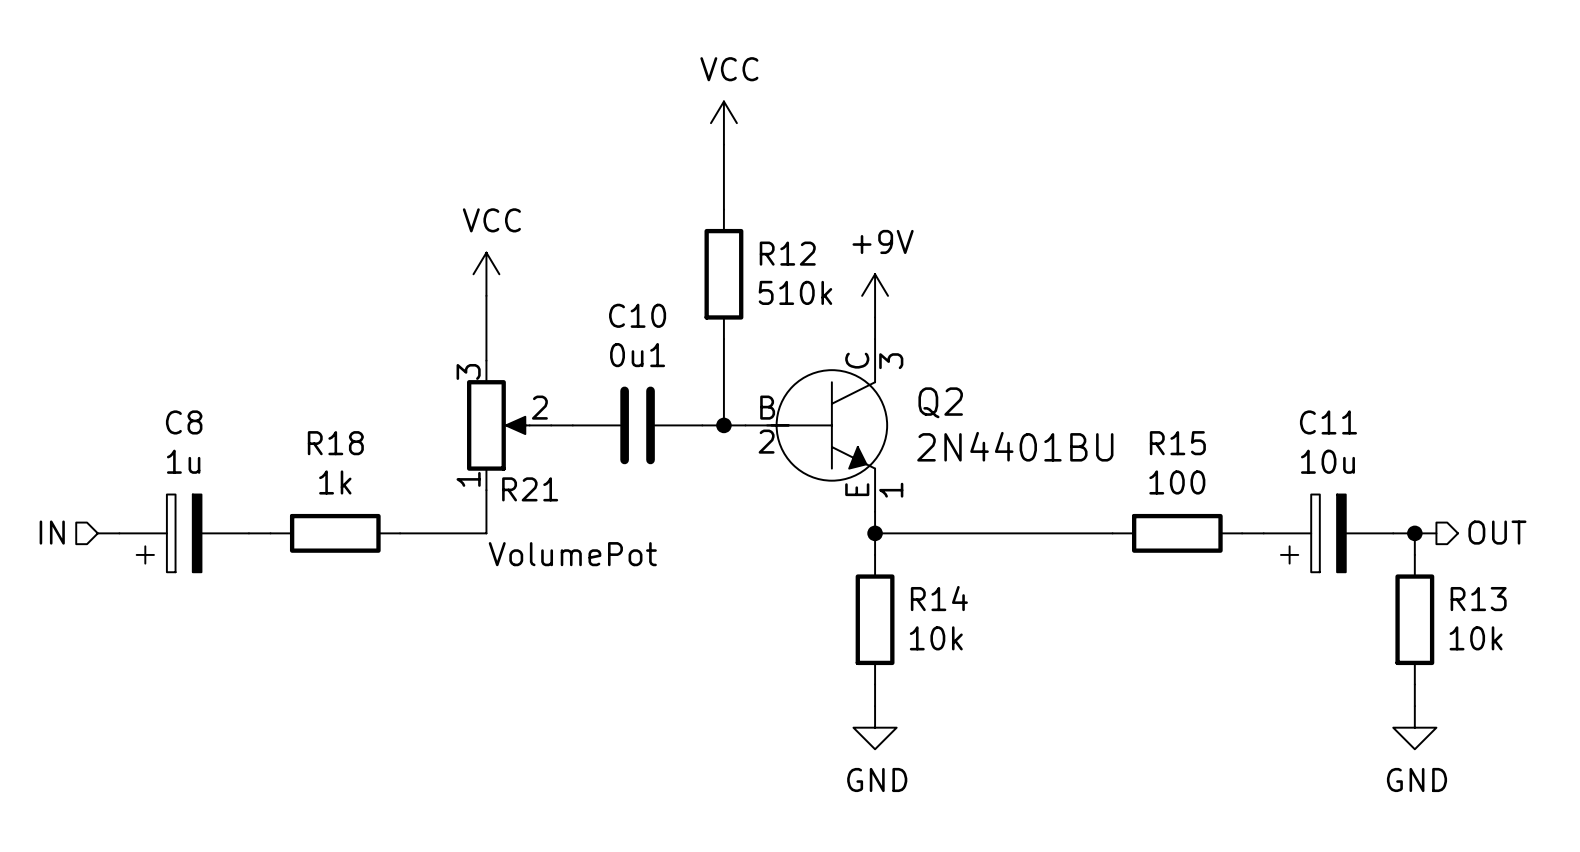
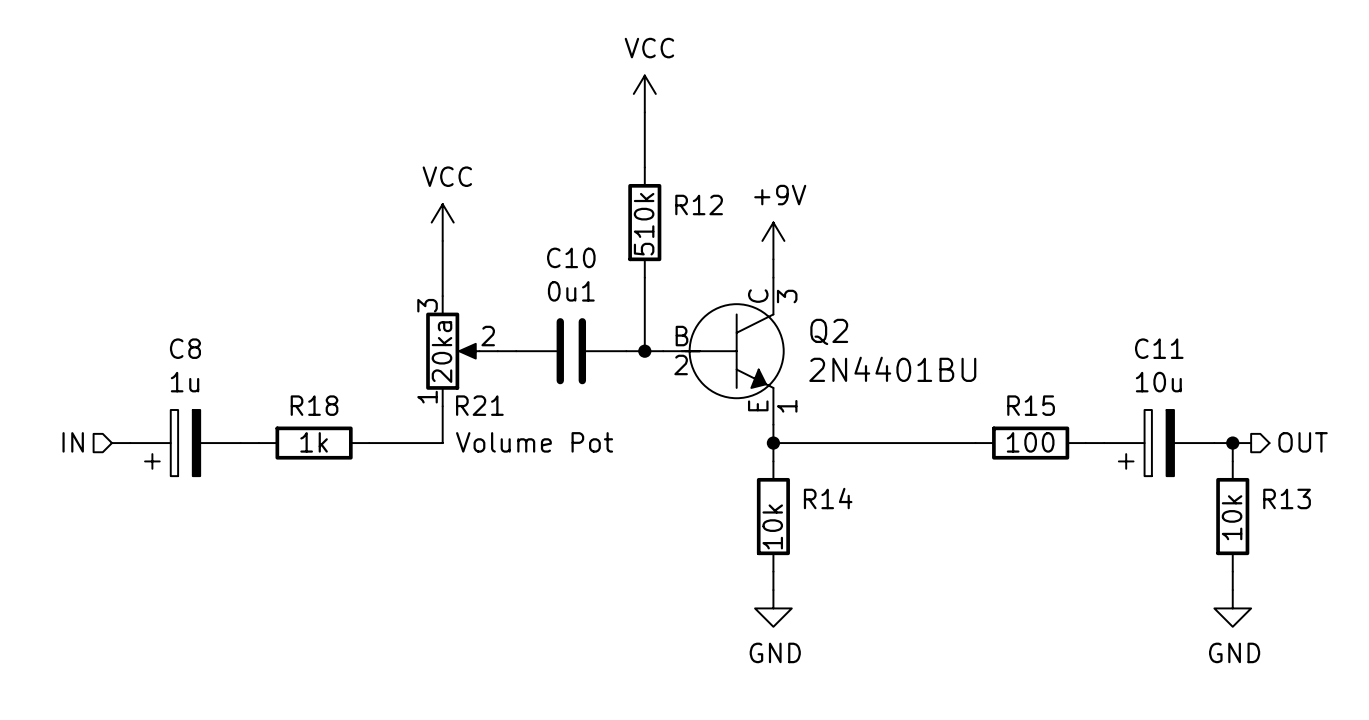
R12 value rotation: 0° (795, 292) -> 90° counterclockwise (644, 224)
R18 name position: R18 (335, 443) -> R18 (314, 405)
R15 name position: R15 (1177, 443) -> R15 (1031, 405)
R18 value position: 1k (335, 482) -> 1k (314, 442)
R15 value position: 100 (1177, 482) -> 100 (1030, 442)
R21 text: none -> Volume Pot (534, 442)
R21 value: VolumePot (572, 554) -> 20ka (442, 352)
R14 value rotation: 0° (936, 638) -> 90° counterclockwise (772, 526)
R13 value rotation: 0° (1476, 638) -> 90° counterclockwise (1232, 517)

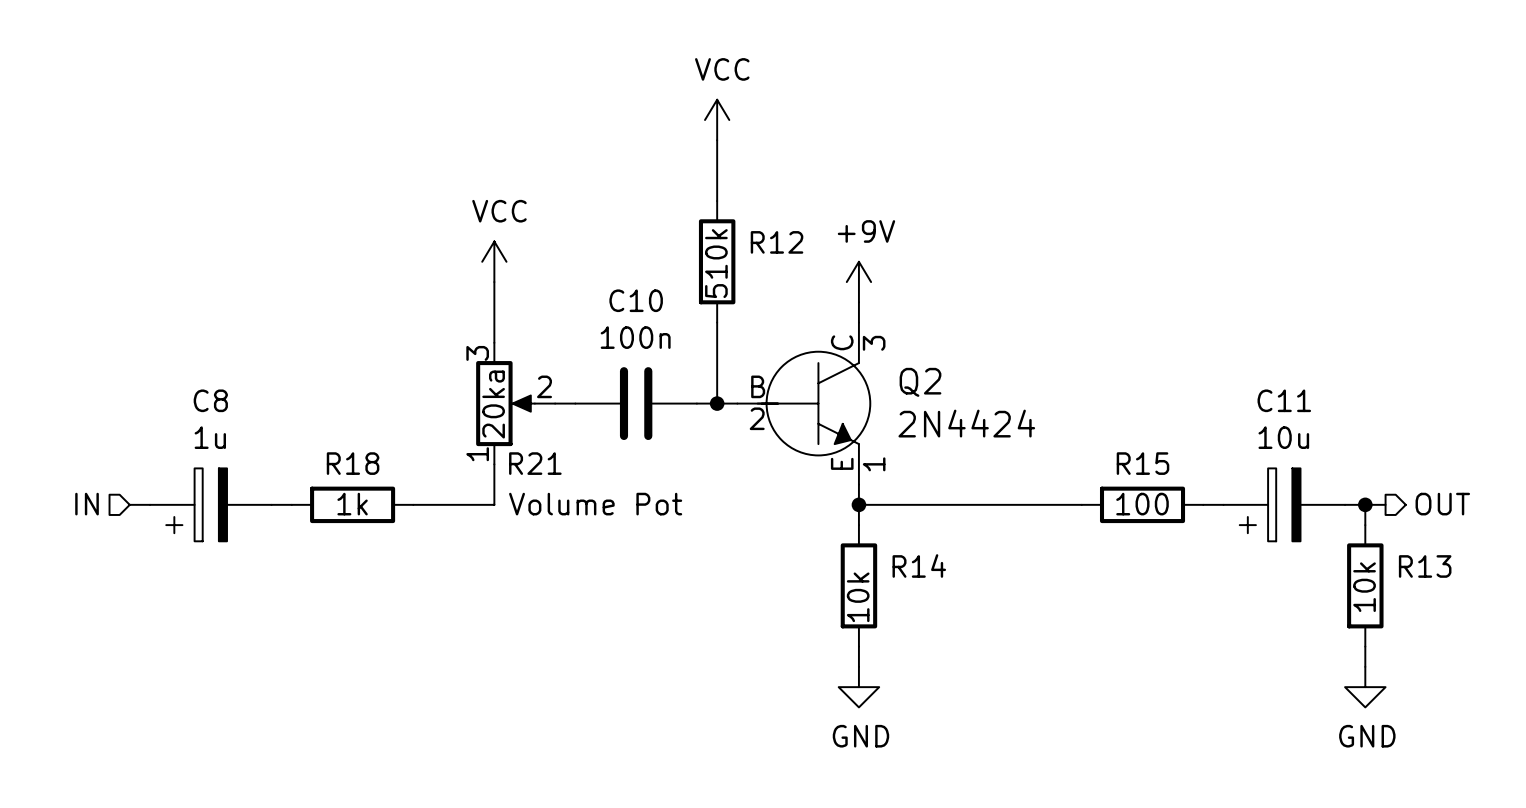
C10 value: 0u1 (571, 291) -> 100n (635, 337)
Q2 value: 2N4401BU (892, 369) -> 2N4424 (966, 423)

